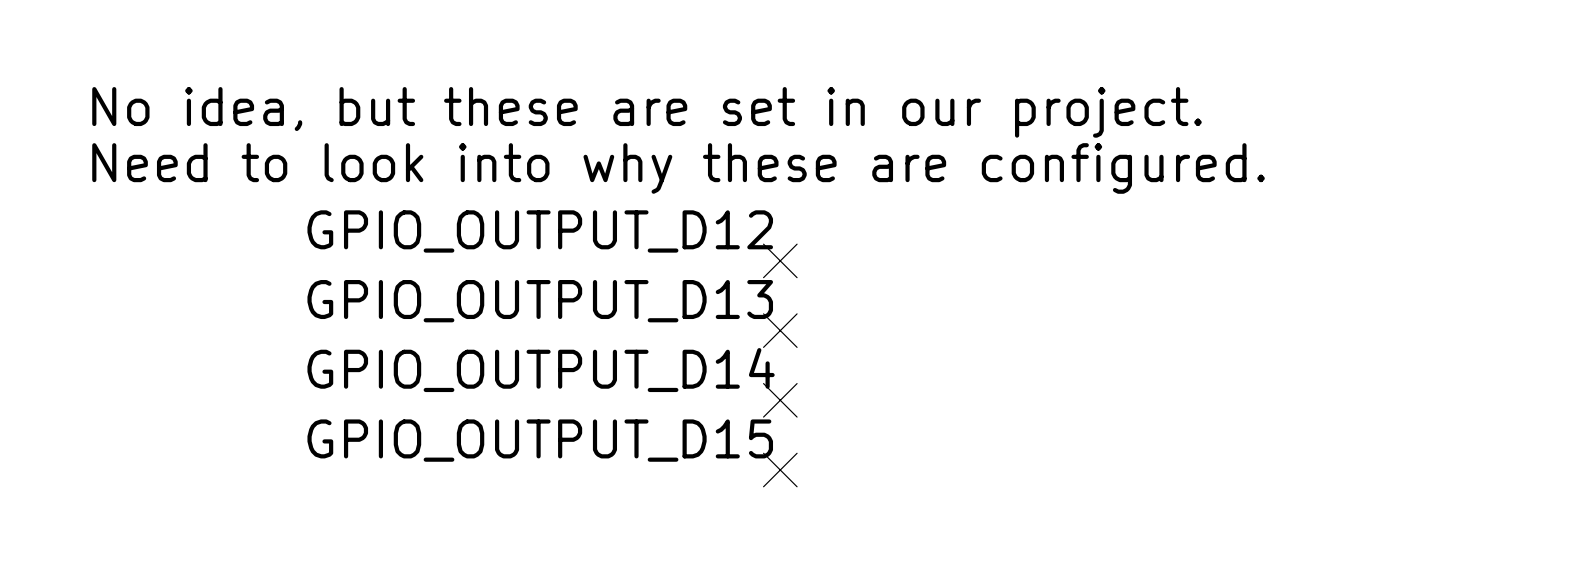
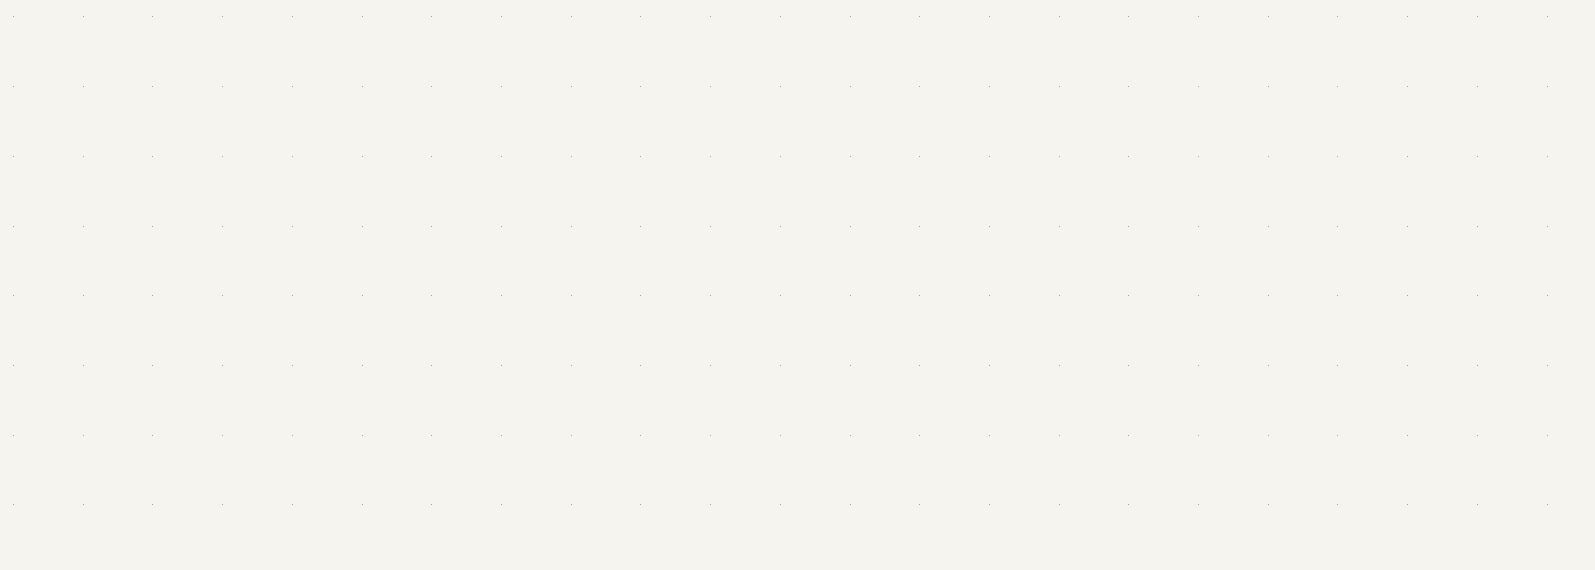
text: No idea, but these are set in our project. (646, 112) -> none
text: Need to look into why these are configured. (678, 168) -> none
label: GPIO_OUTPUT_D12 (540, 231) -> none
no-connect mark: (780, 260) -> none
label: GPIO_OUTPUT_D13 (540, 301) -> none
no-connect mark: (780, 330) -> none
label: GPIO_OUTPUT_D14 (541, 370) -> none
no-connect mark: (780, 400) -> none
label: GPIO_OUTPUT_D15 (540, 440) -> none
no-connect mark: (780, 470) -> none

